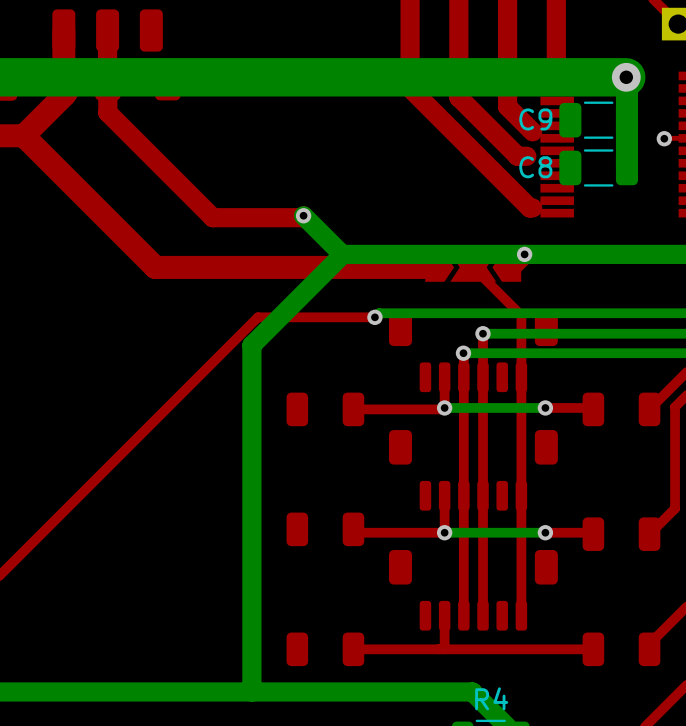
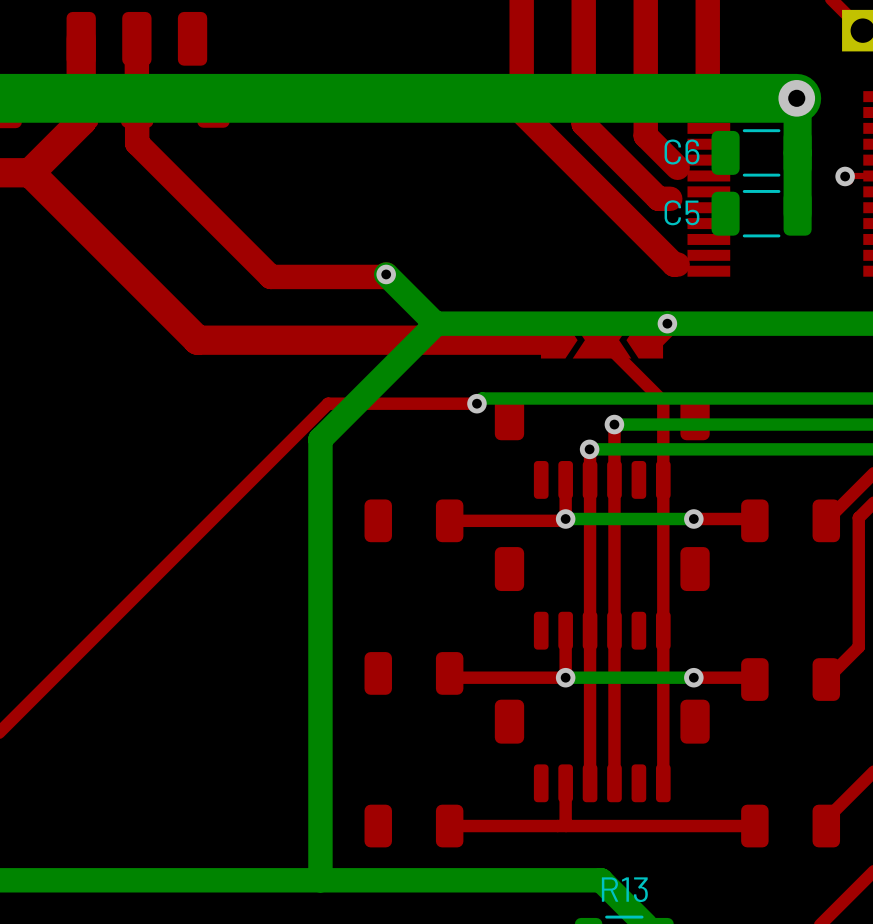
C9 name: C9 (535, 119) -> C6 (682, 152)
C8 name: C8 (535, 167) -> C5 (682, 212)
R4 name: R4 (491, 698) -> R13 (624, 889)

